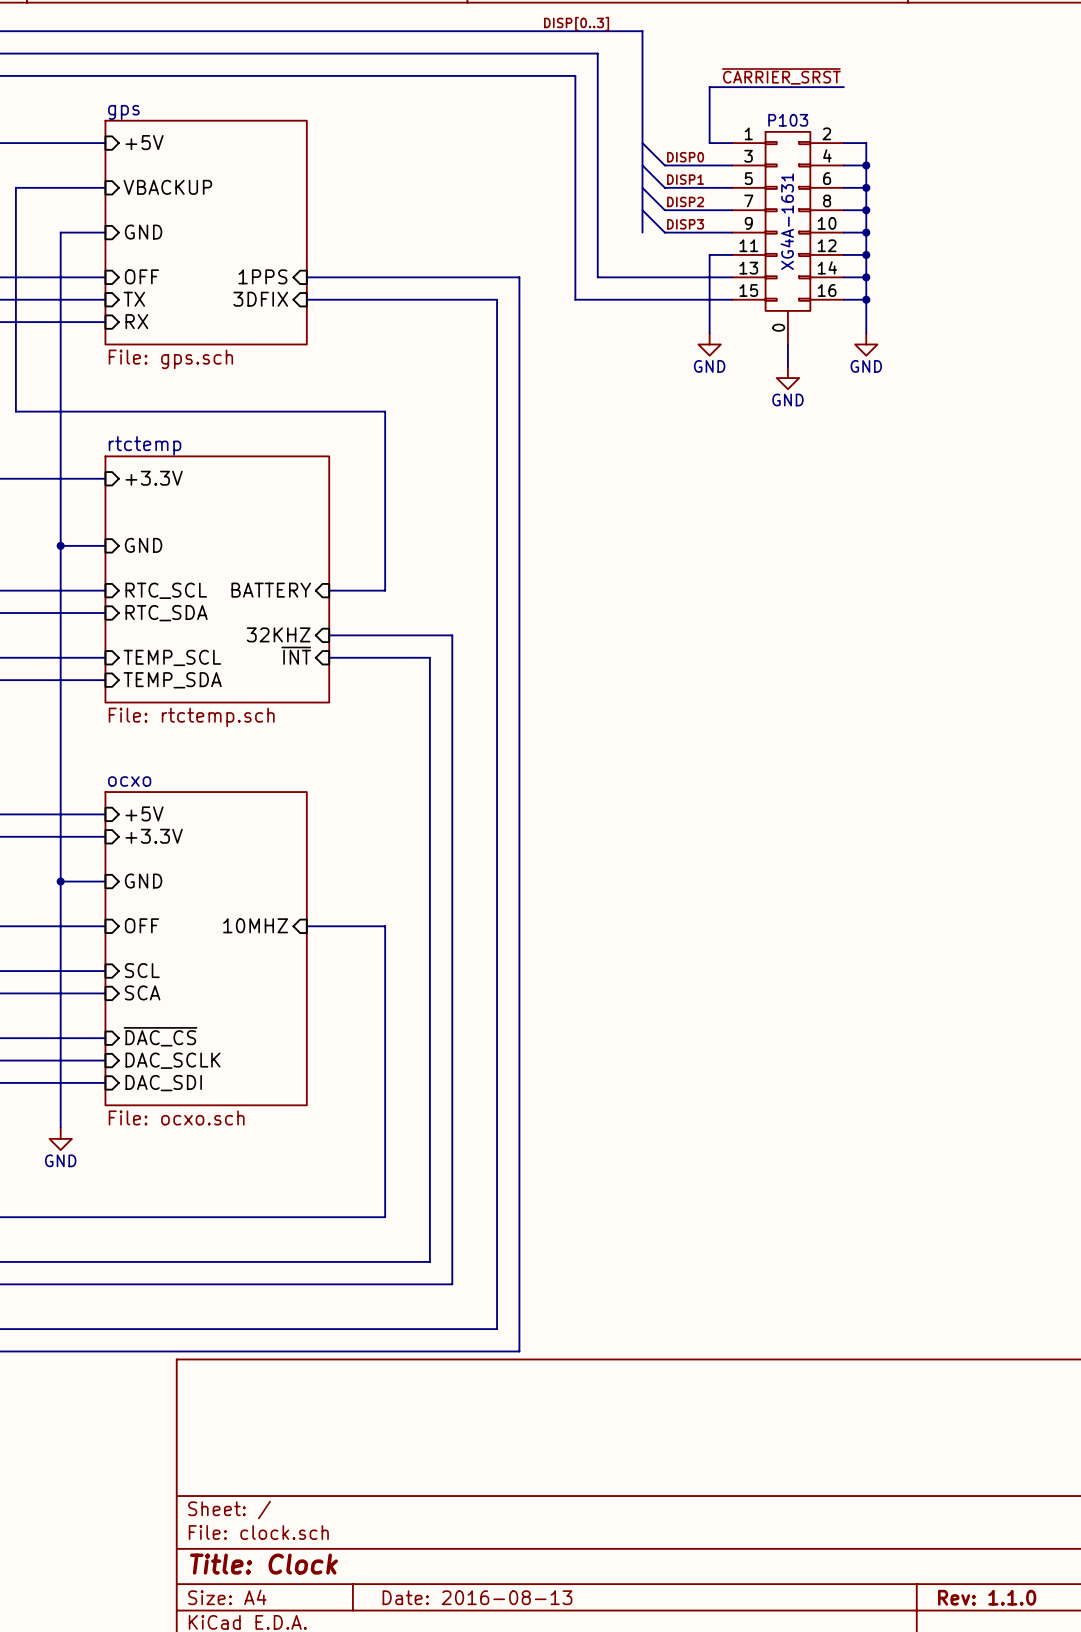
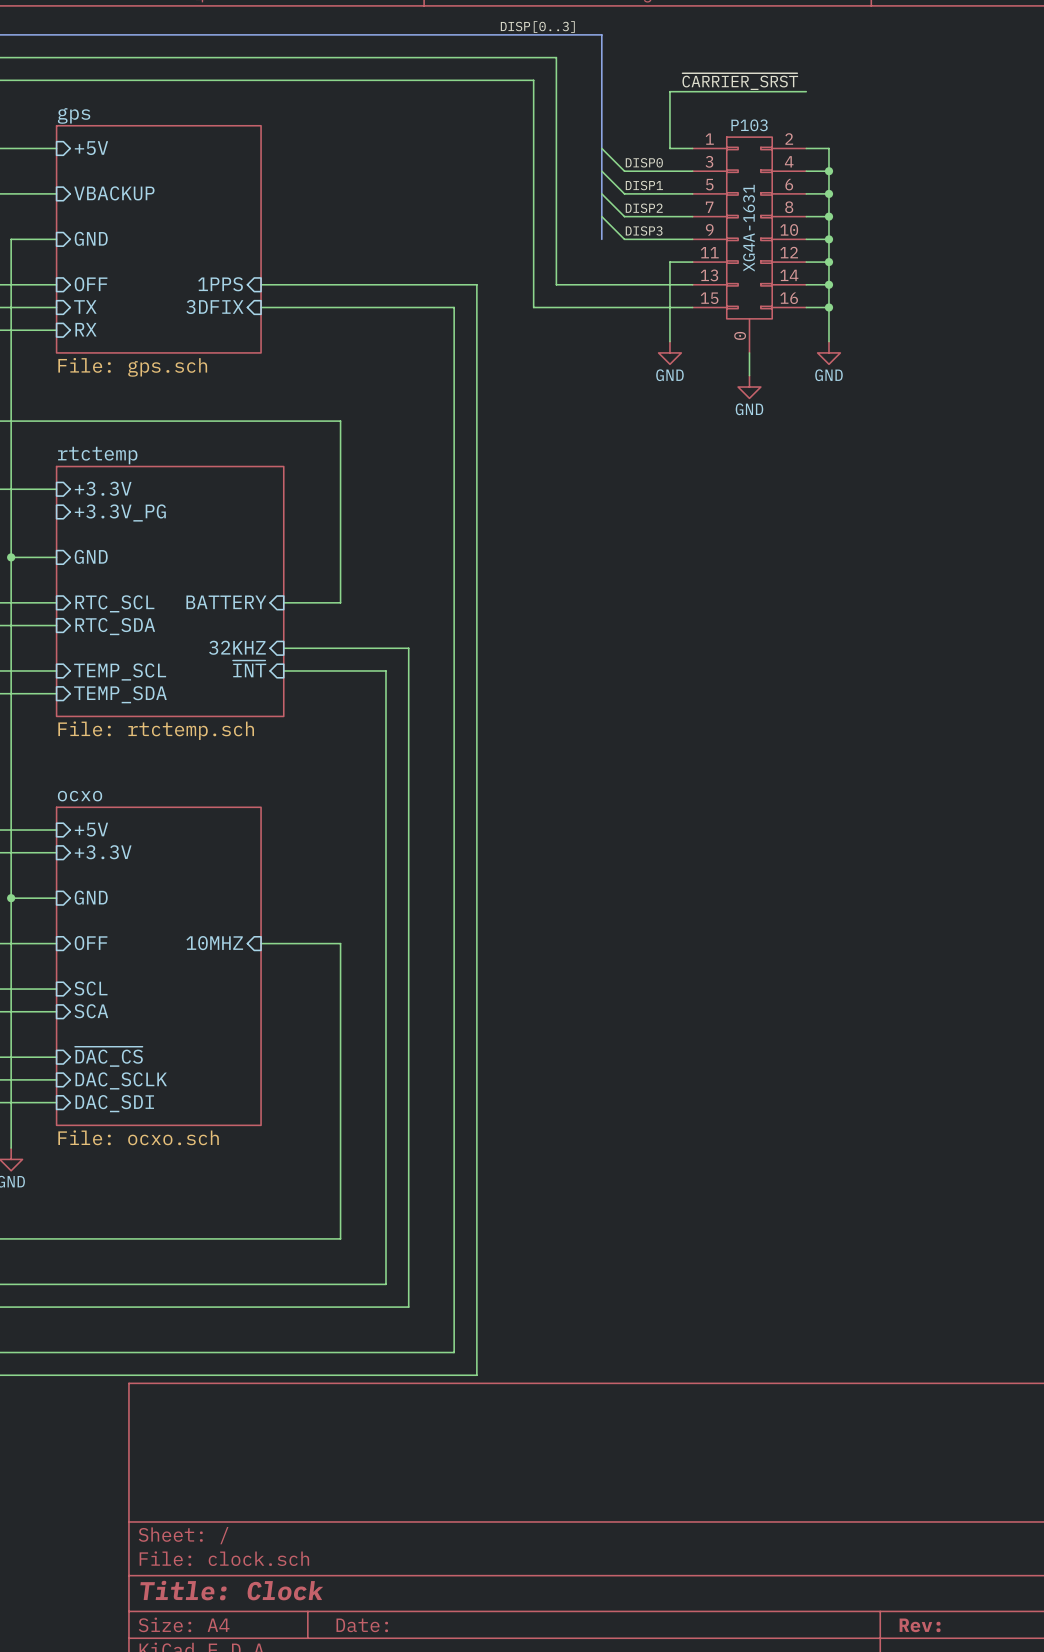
sheet pin: none -> +3.3V_PG (120, 512)
title block: Date: 2016-08-13 (477, 1597) -> Date: (362, 1625)
title block: Rev: 1.1.0 (987, 1597) -> Rev: (920, 1625)

